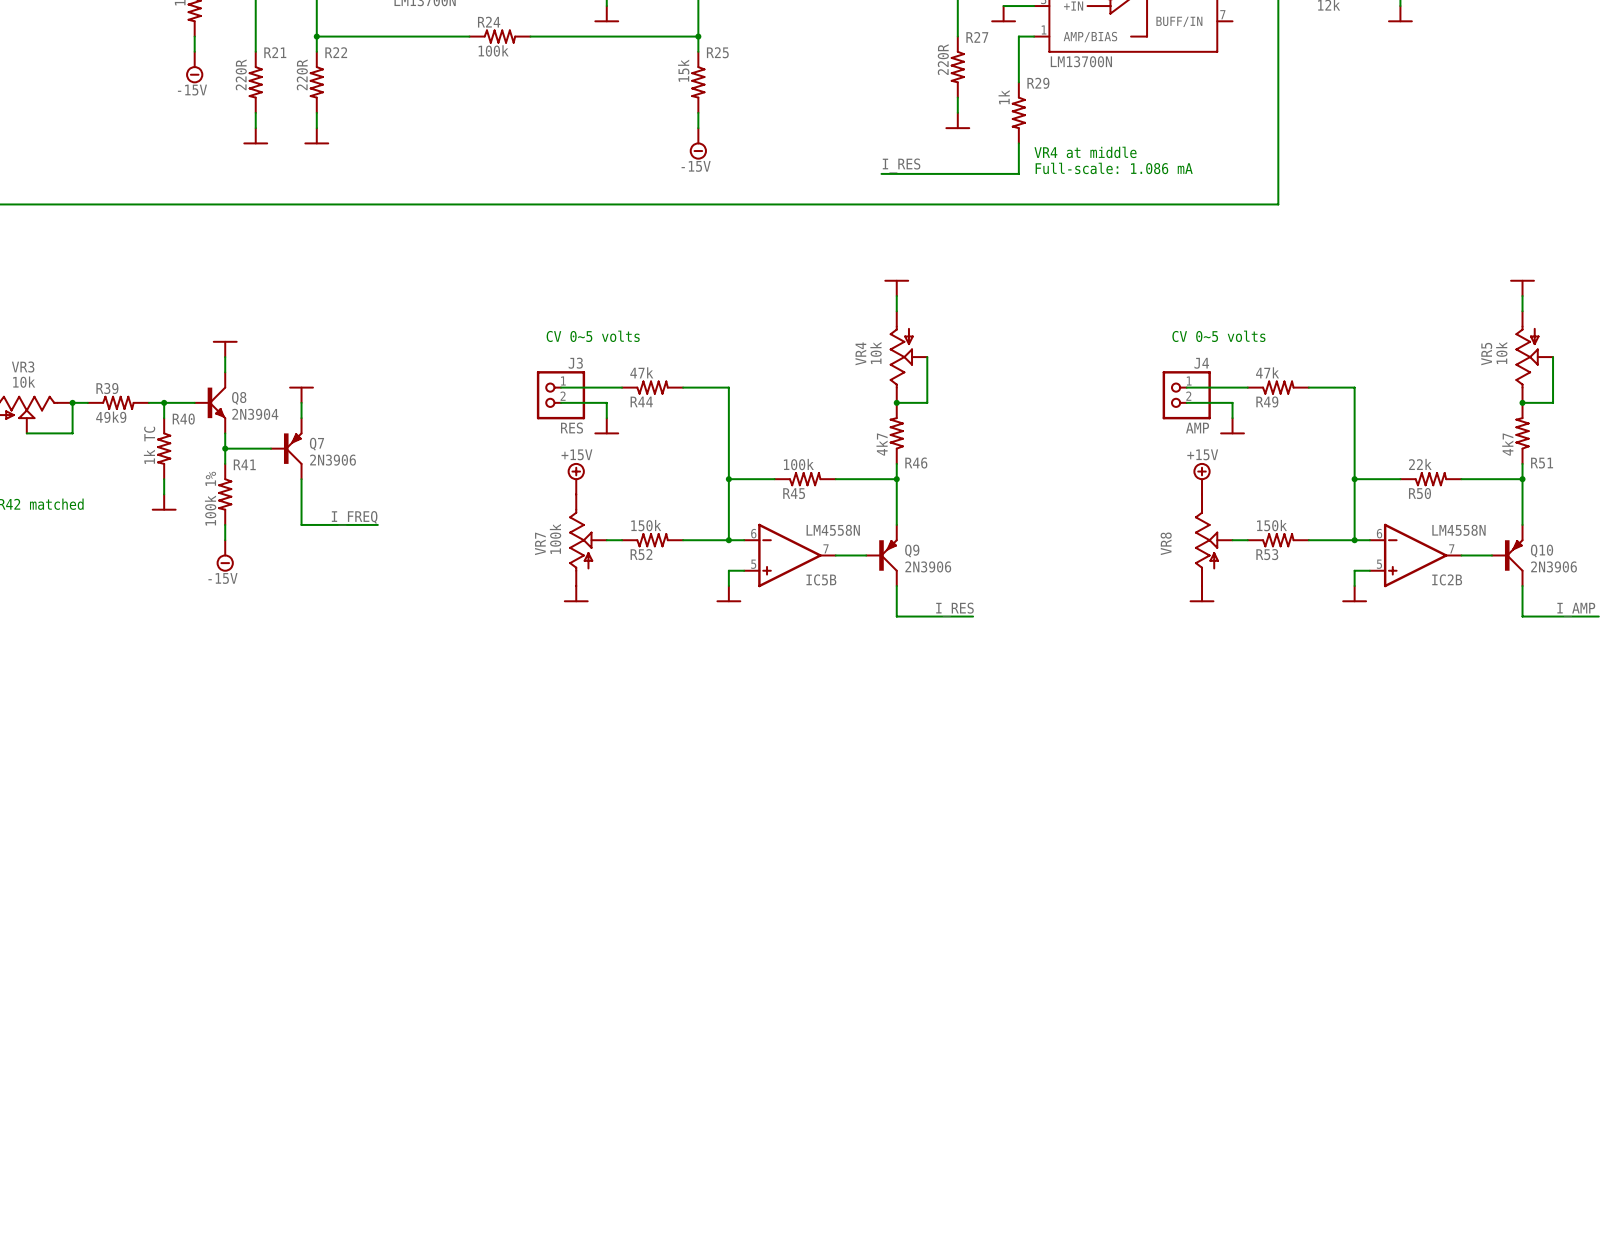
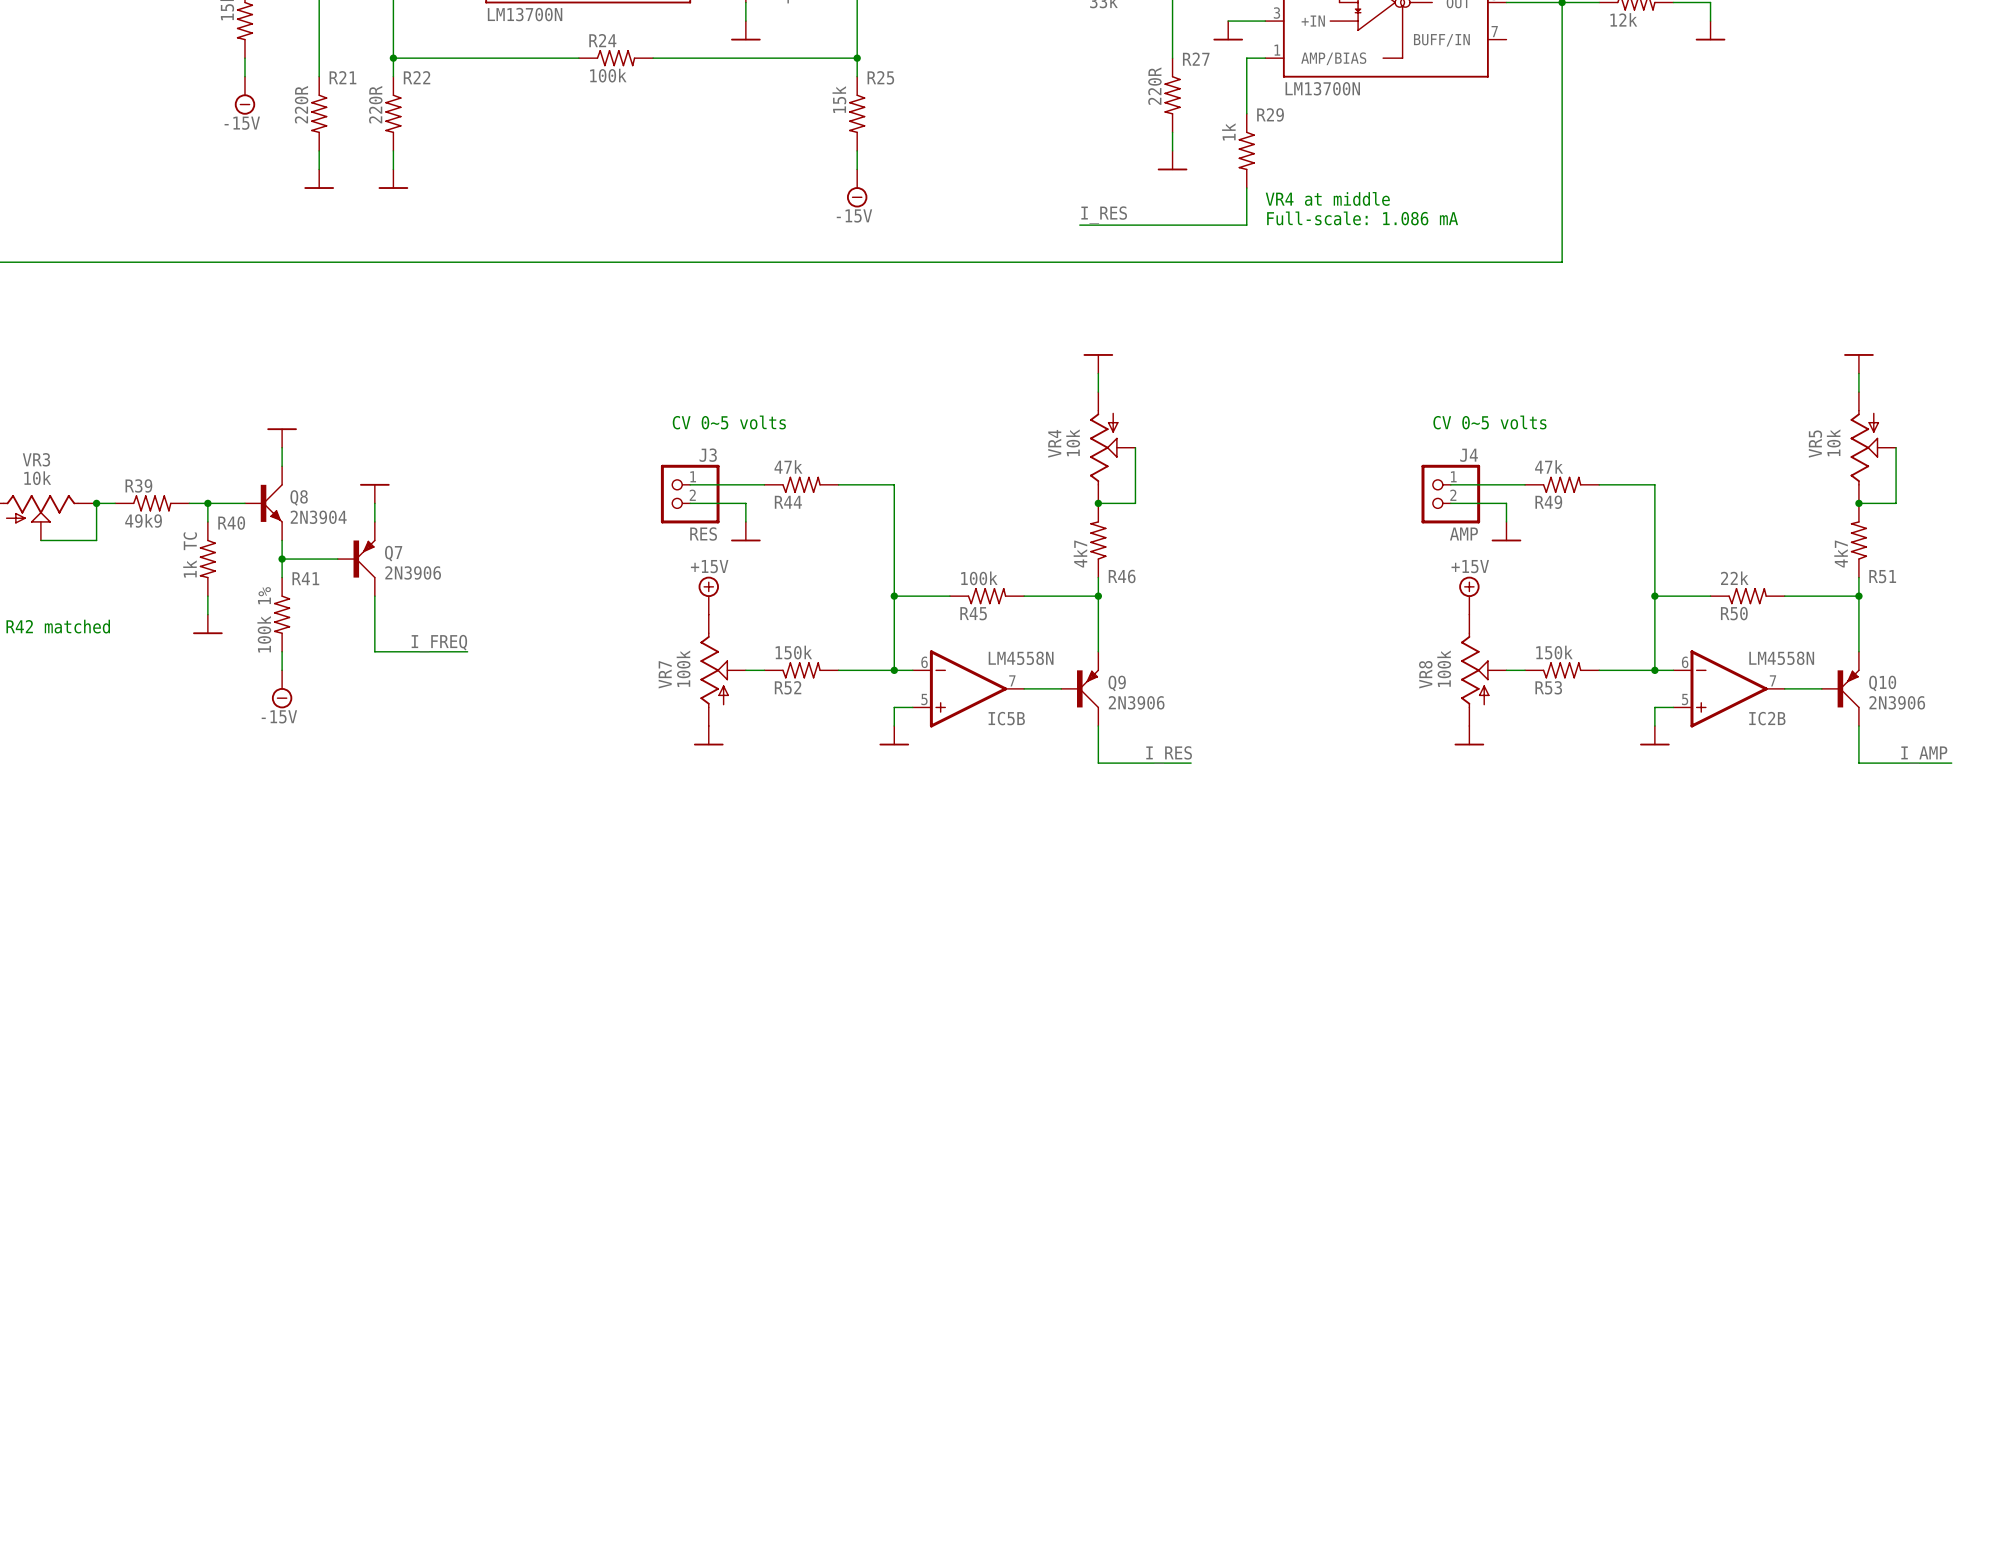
VR8 value: none -> 100k (1444, 668)

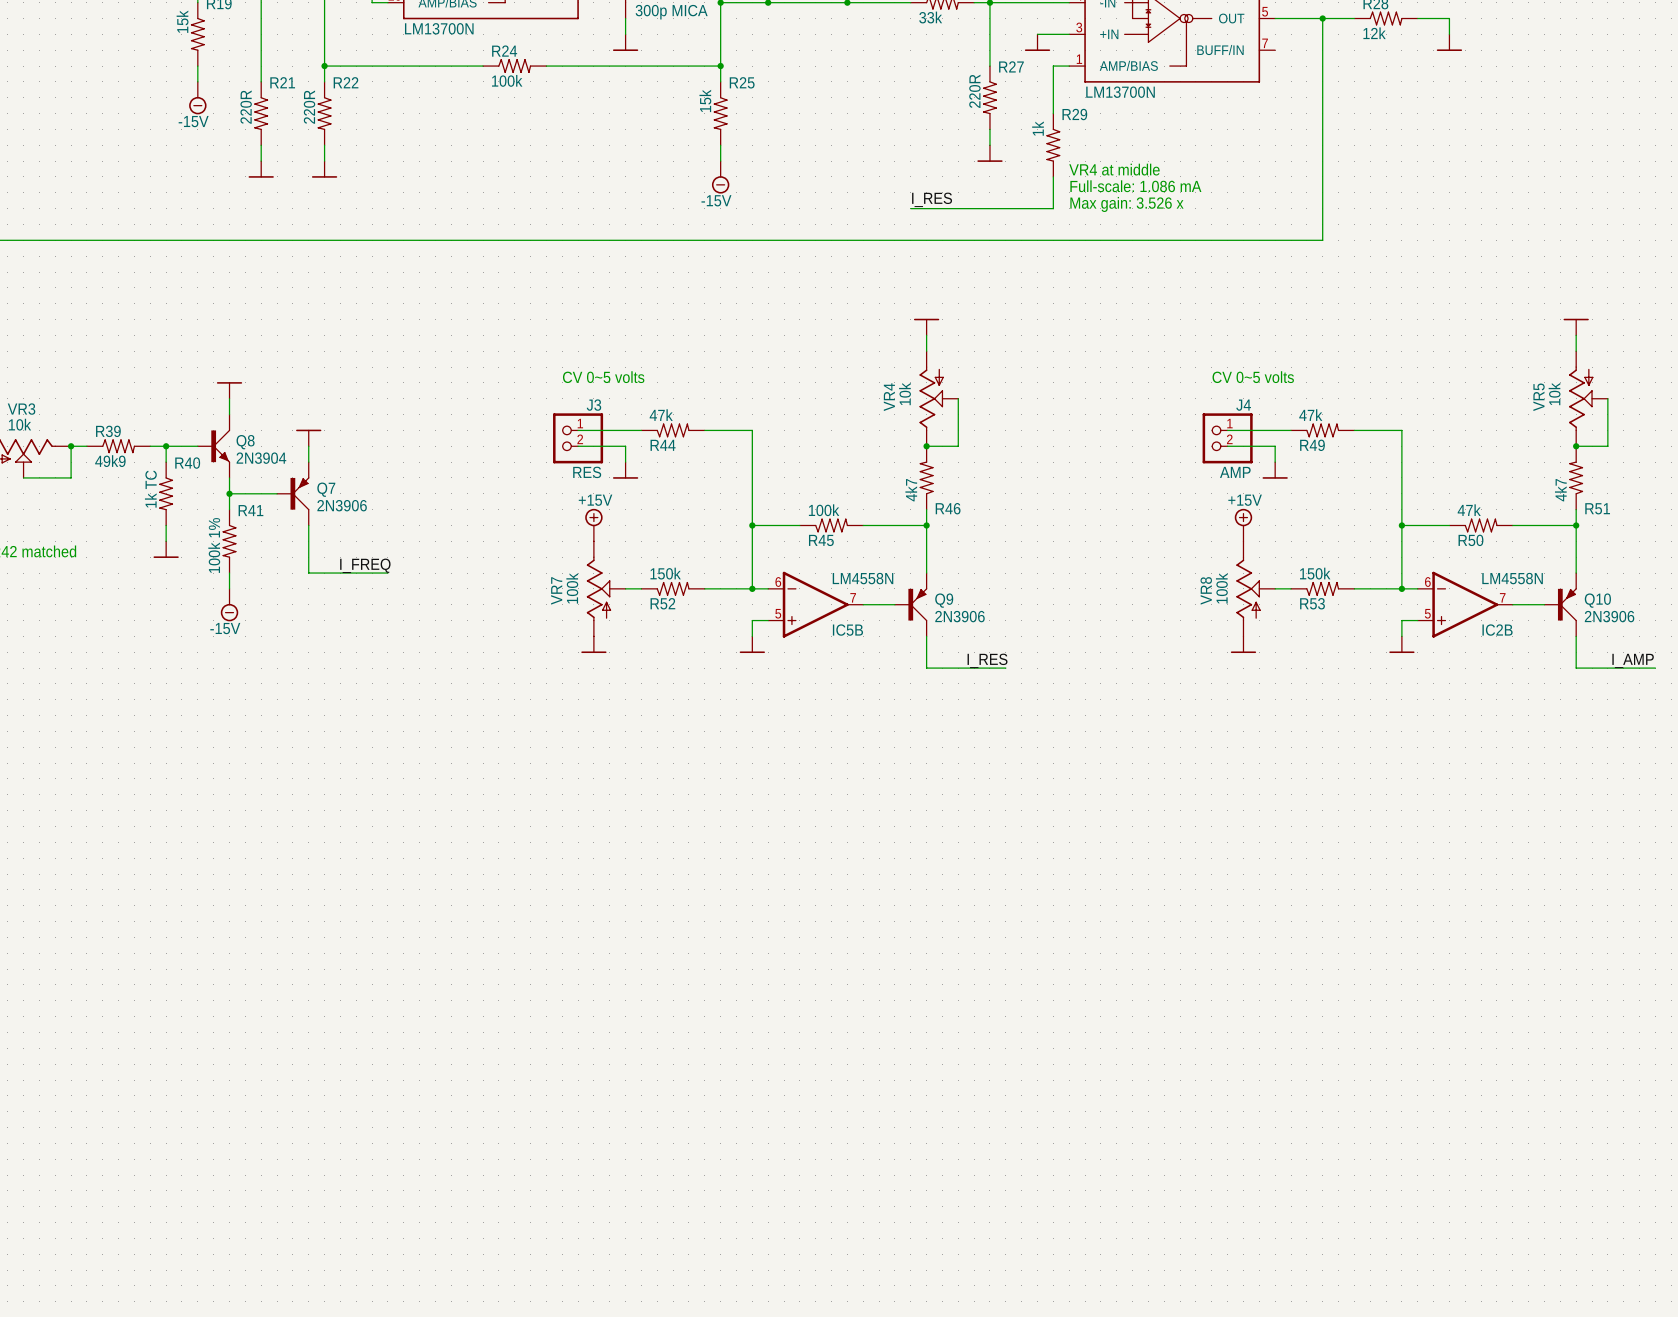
text: none -> VR4 at middle (1114, 169)
text: VR4 at middle (1327, 198) -> Full-scale: 1.086 mA (1135, 186)
text: Full-scale: 1.086 mA (1362, 218) -> Max gain: 3.526 x (1126, 204)
R50 value: 22k (1734, 578) -> 47k (1469, 510)

